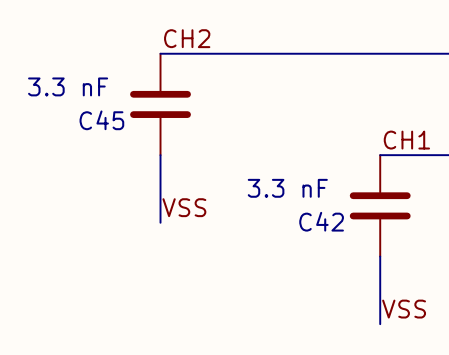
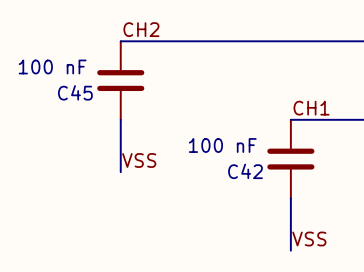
C45 value: 3.3 nF (68, 86) -> 100 nF (52, 66)
C42 value: 3.3 nF (287, 188) -> 100 nF (222, 145)

